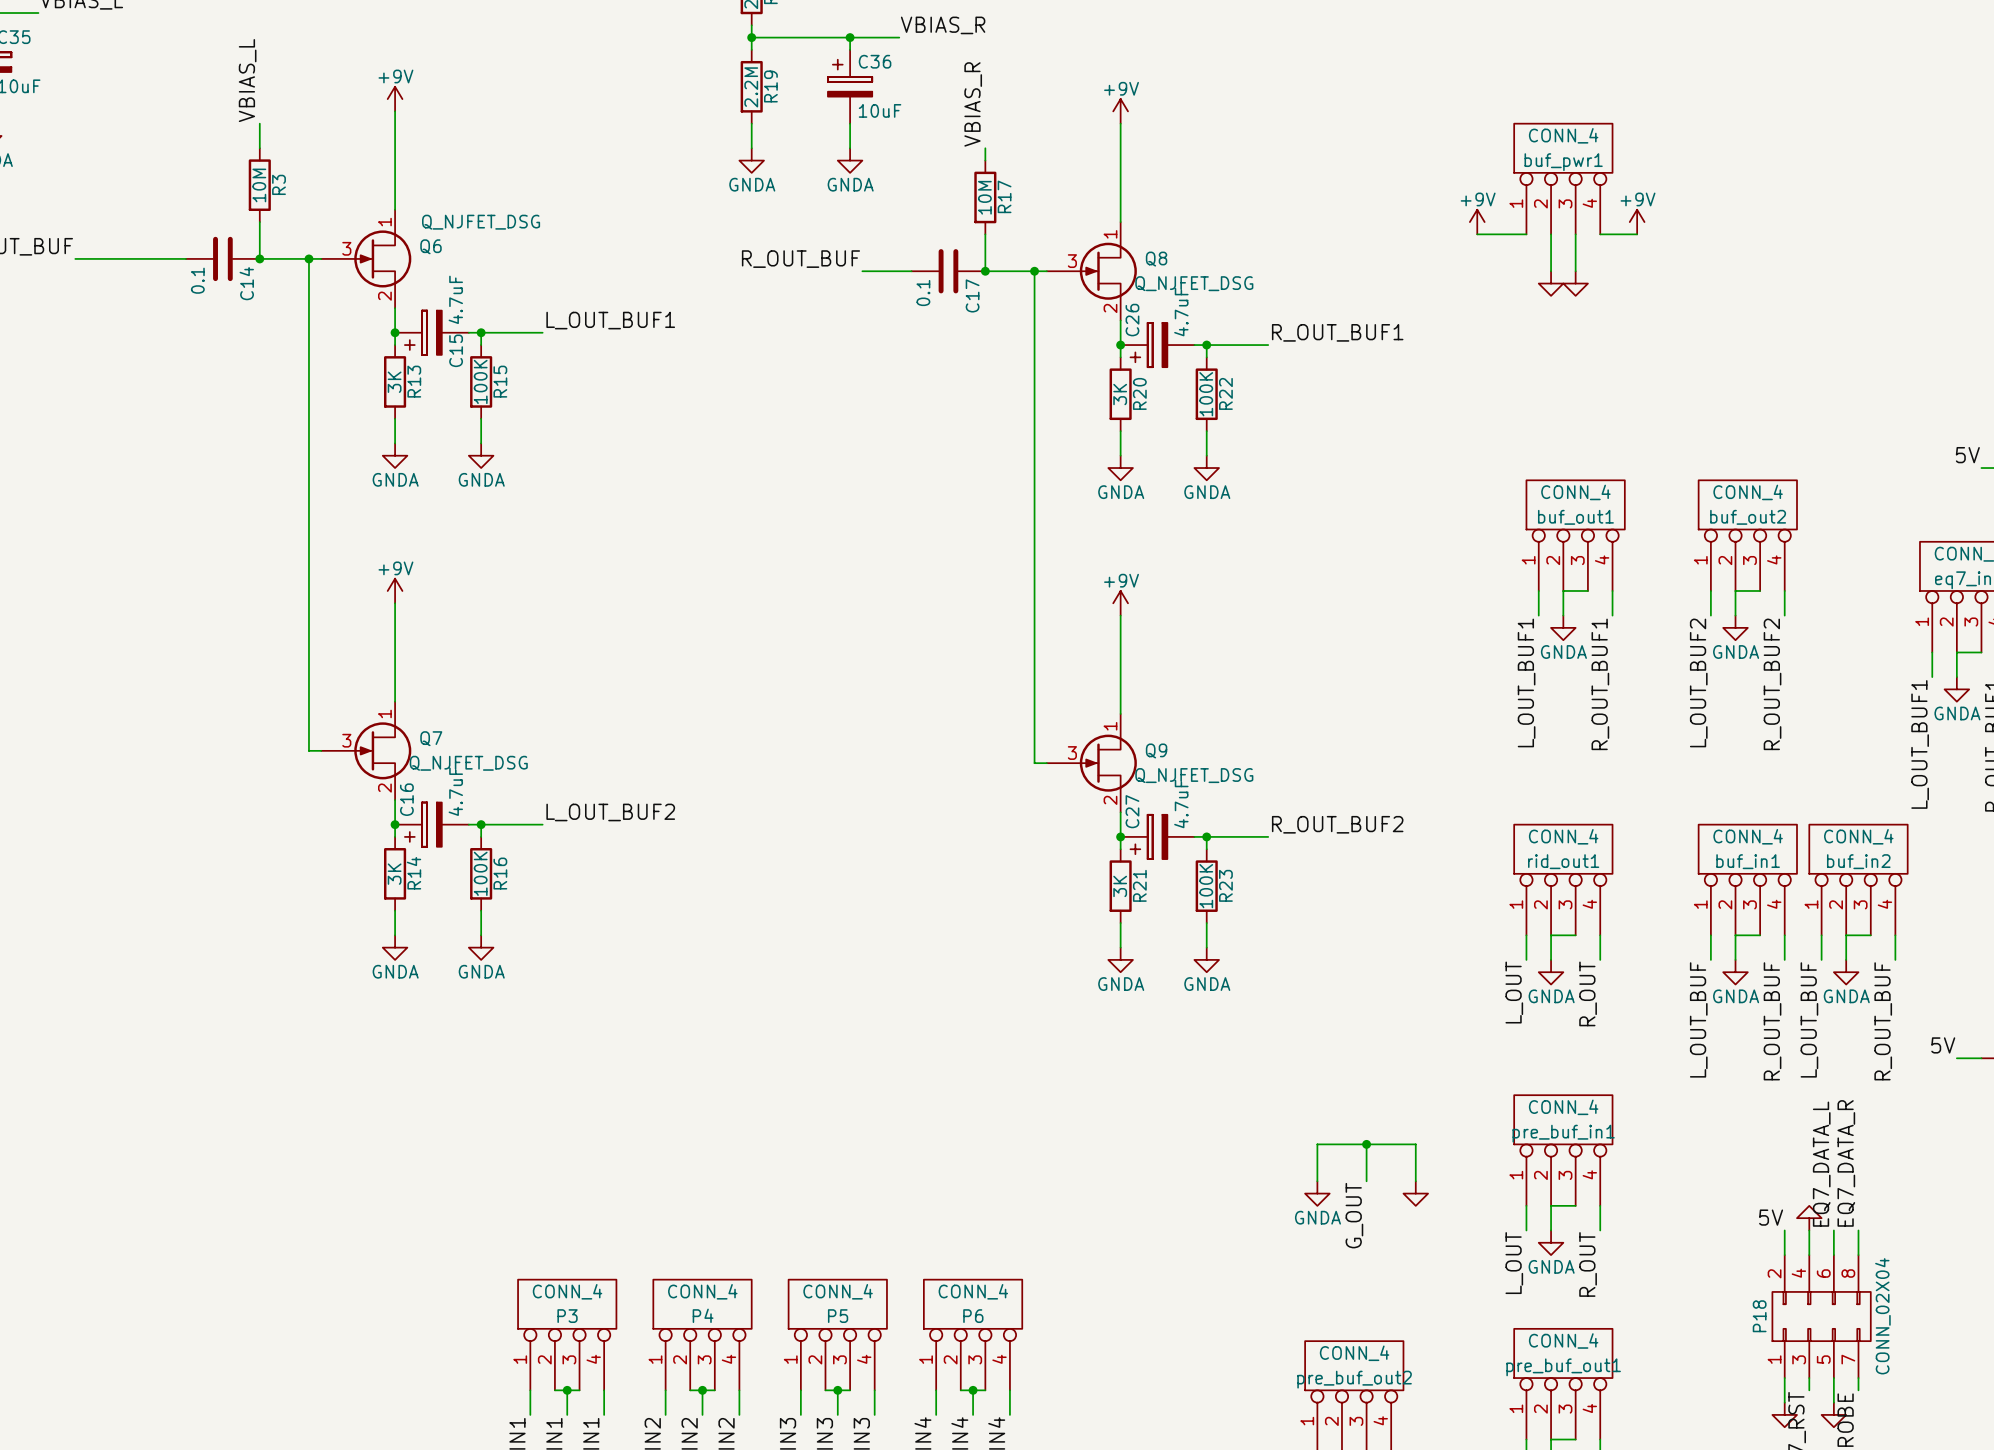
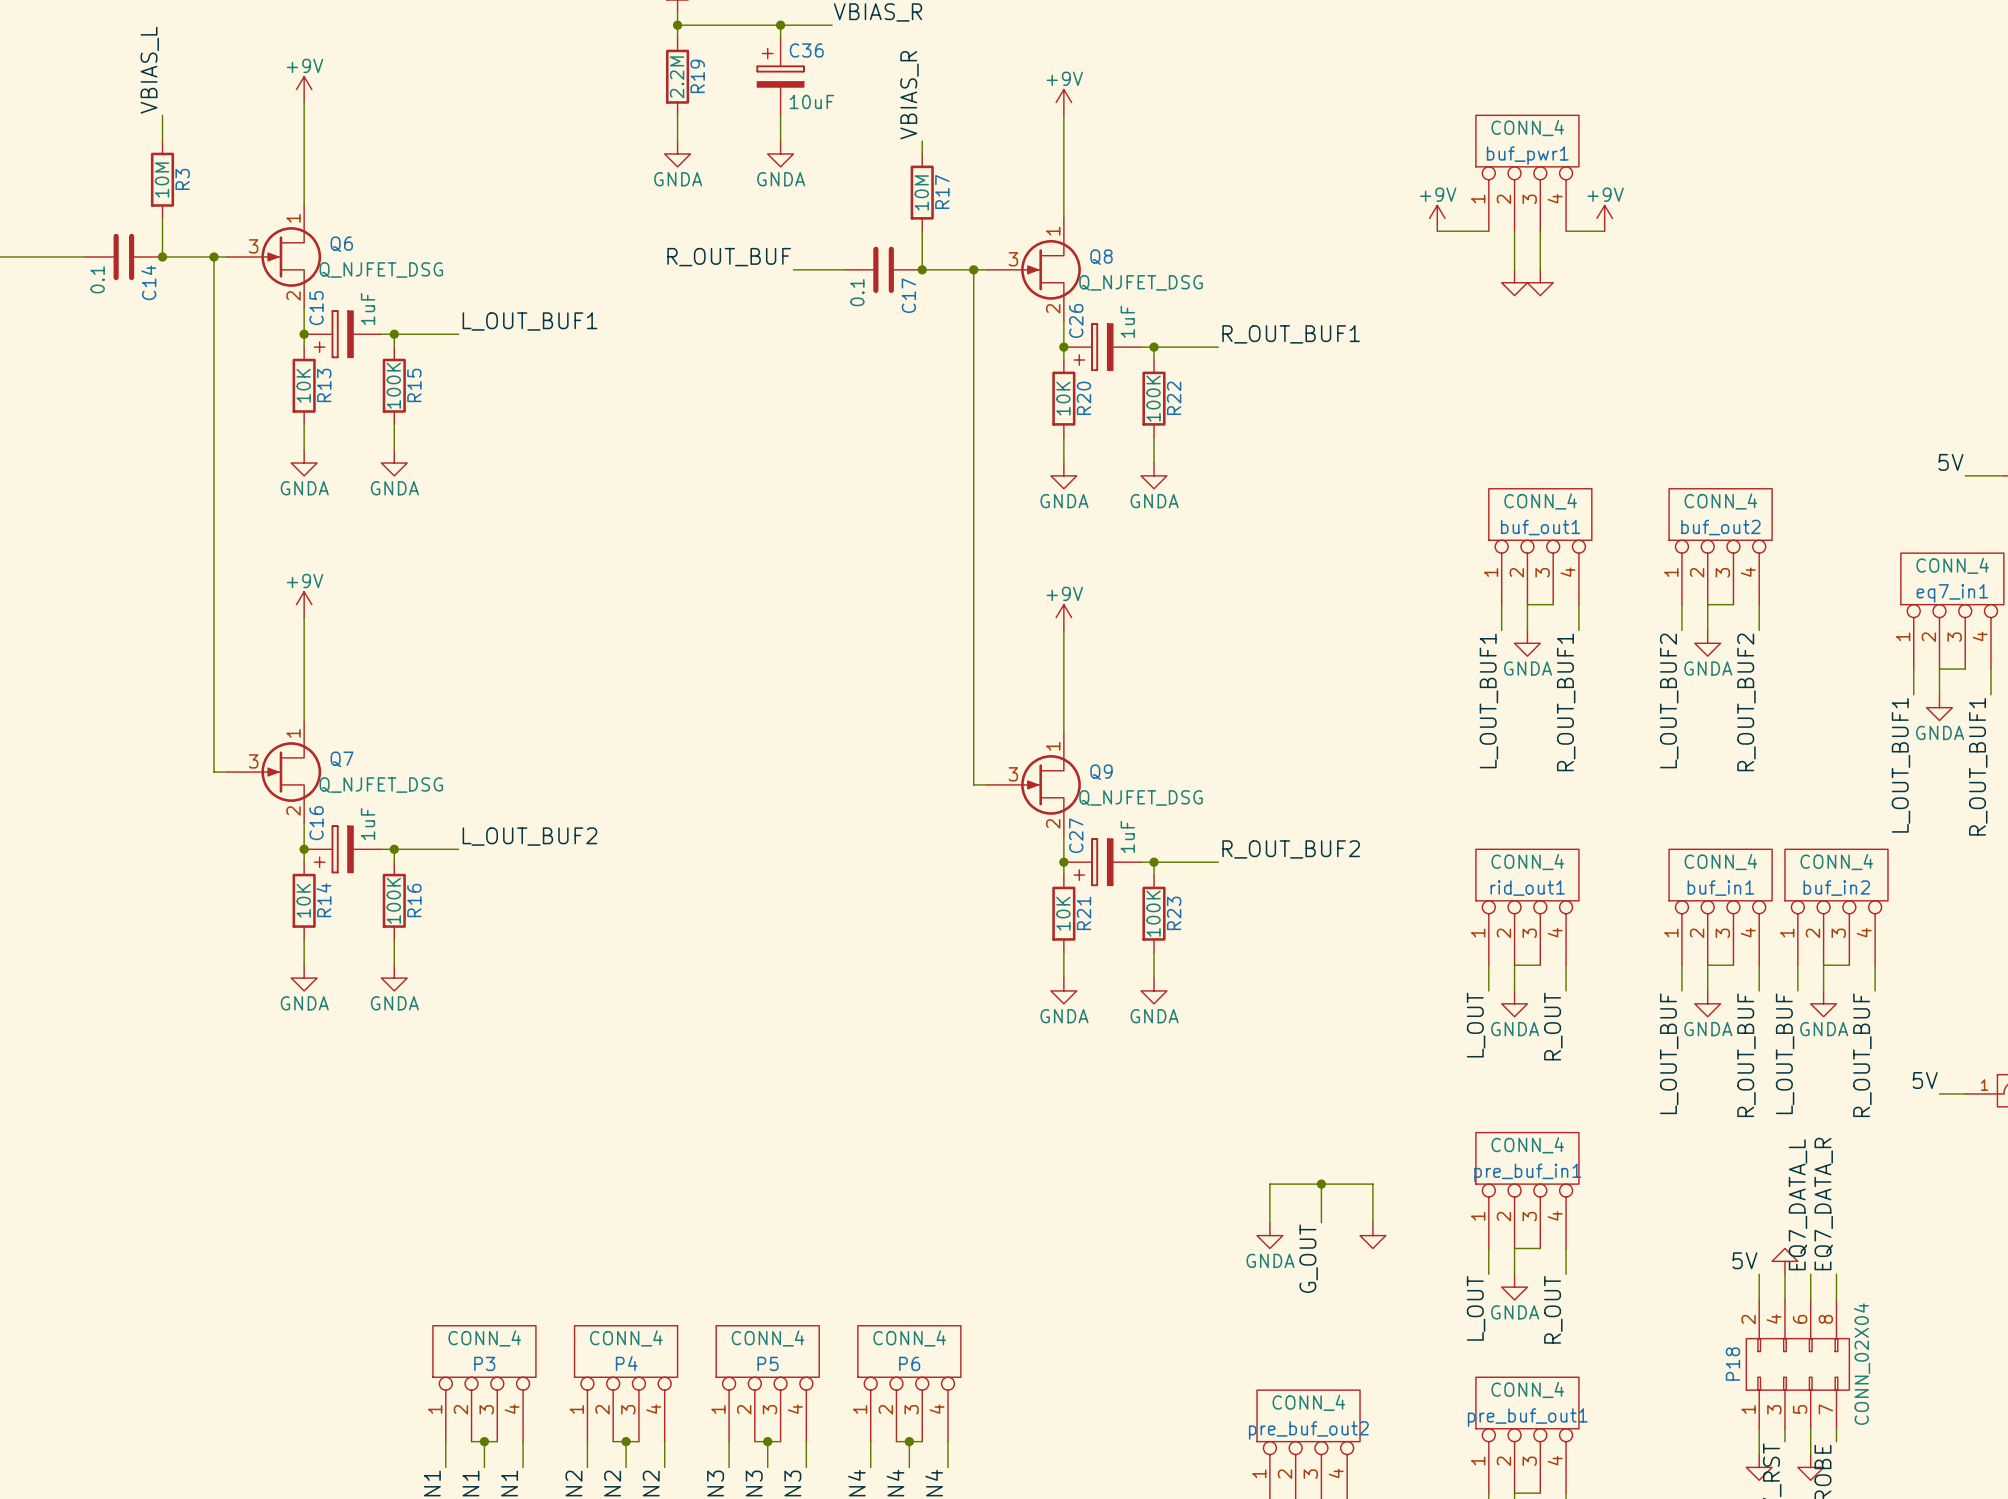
Q6 value position: Q_NJFET_DSG (481, 222) -> Q_NJFET_DSG (381, 269)
C15 value: 4.7uF (455, 299) -> 1uF (368, 309)
C26 value: 4.7uF (1181, 312) -> 1uF (1127, 321)
C15 name position: C15 (456, 350) -> C15 (316, 308)
R13 value: 3K (394, 382) -> 10K (303, 385)
R20 value: 3K (1120, 394) -> 10K (1063, 398)
C16 value: 4.7uF (455, 791) -> 1uF (368, 824)
C27 value: 4.7uF (1181, 804) -> 1uF (1127, 836)
R14 value: 3K (394, 874) -> 10K (303, 900)
R21 value: 3K (1120, 886) -> 10K (1063, 913)

